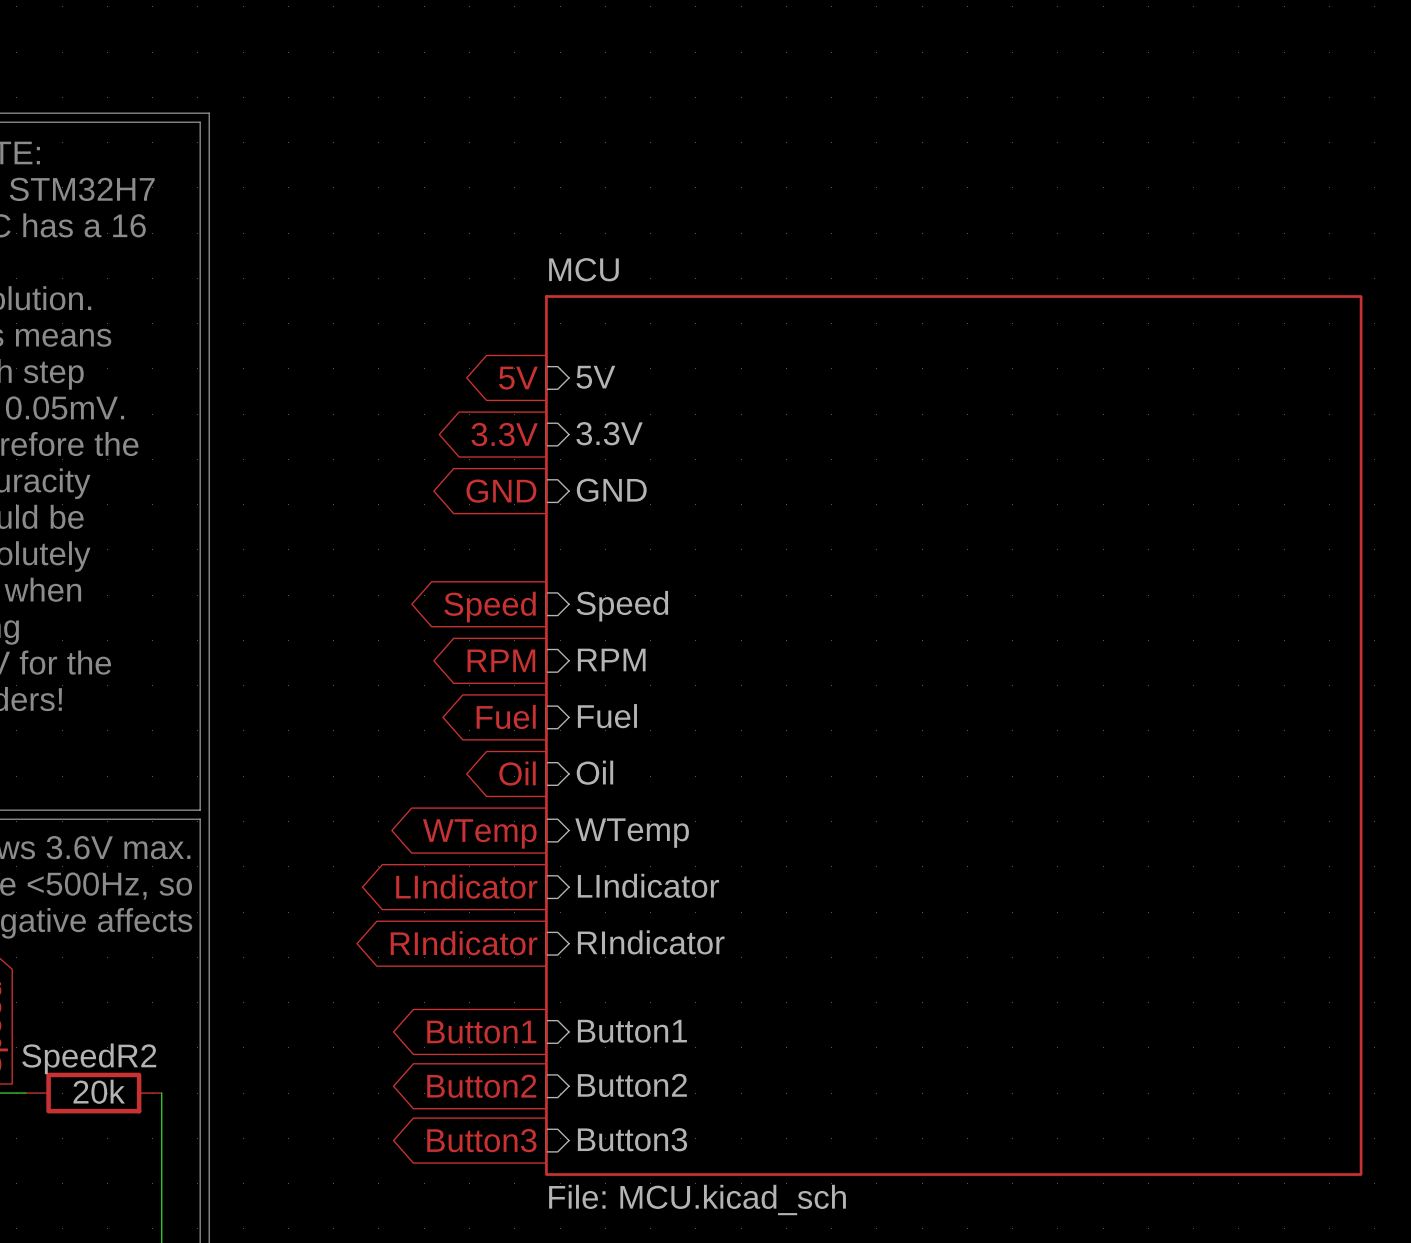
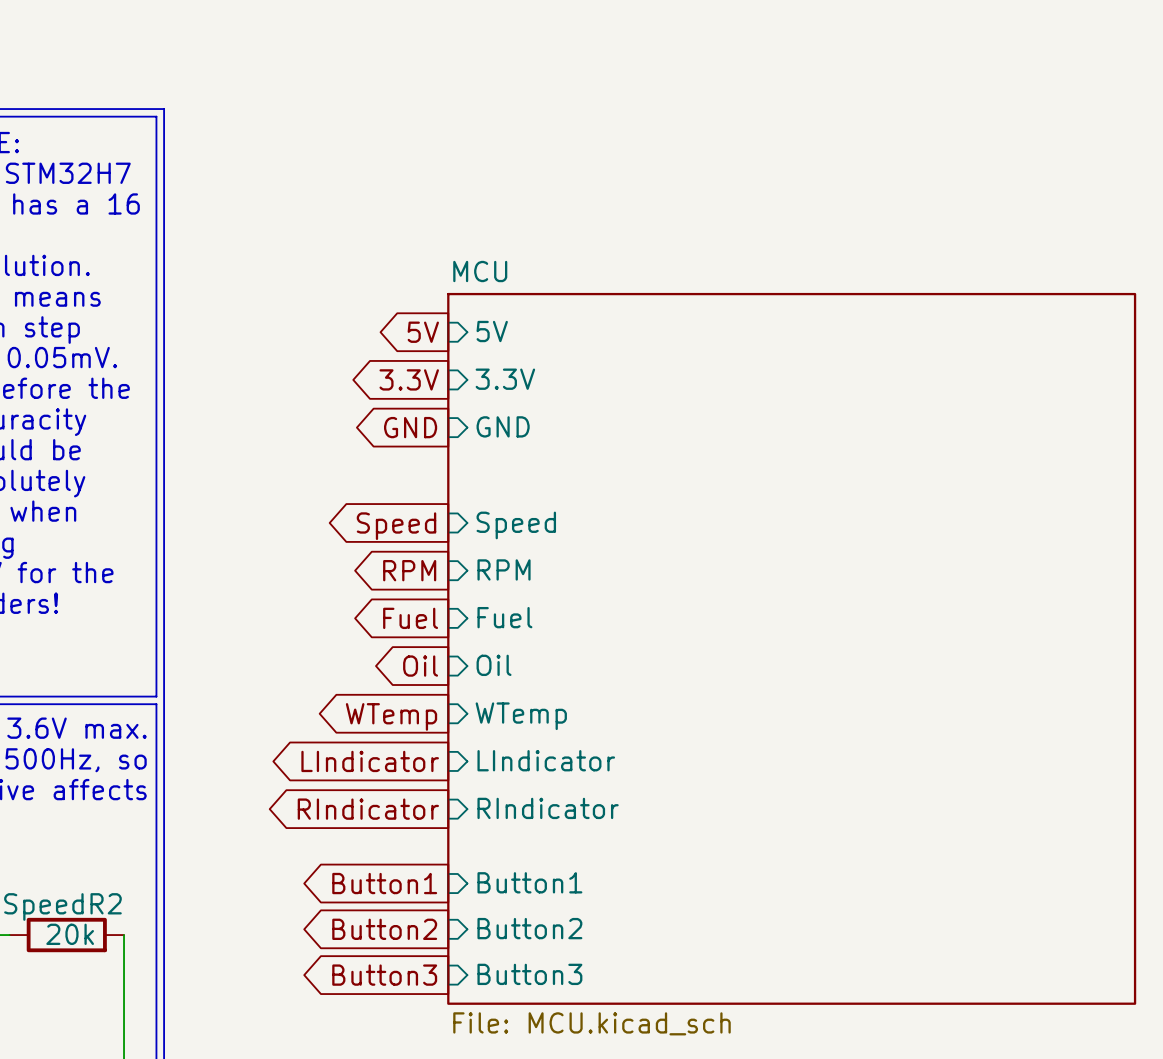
sheet MCU: File: MCU.kicad_sch (953, 735) -> none
sheet MCU: none -> File: MCU.kicad_sch (791, 648)

